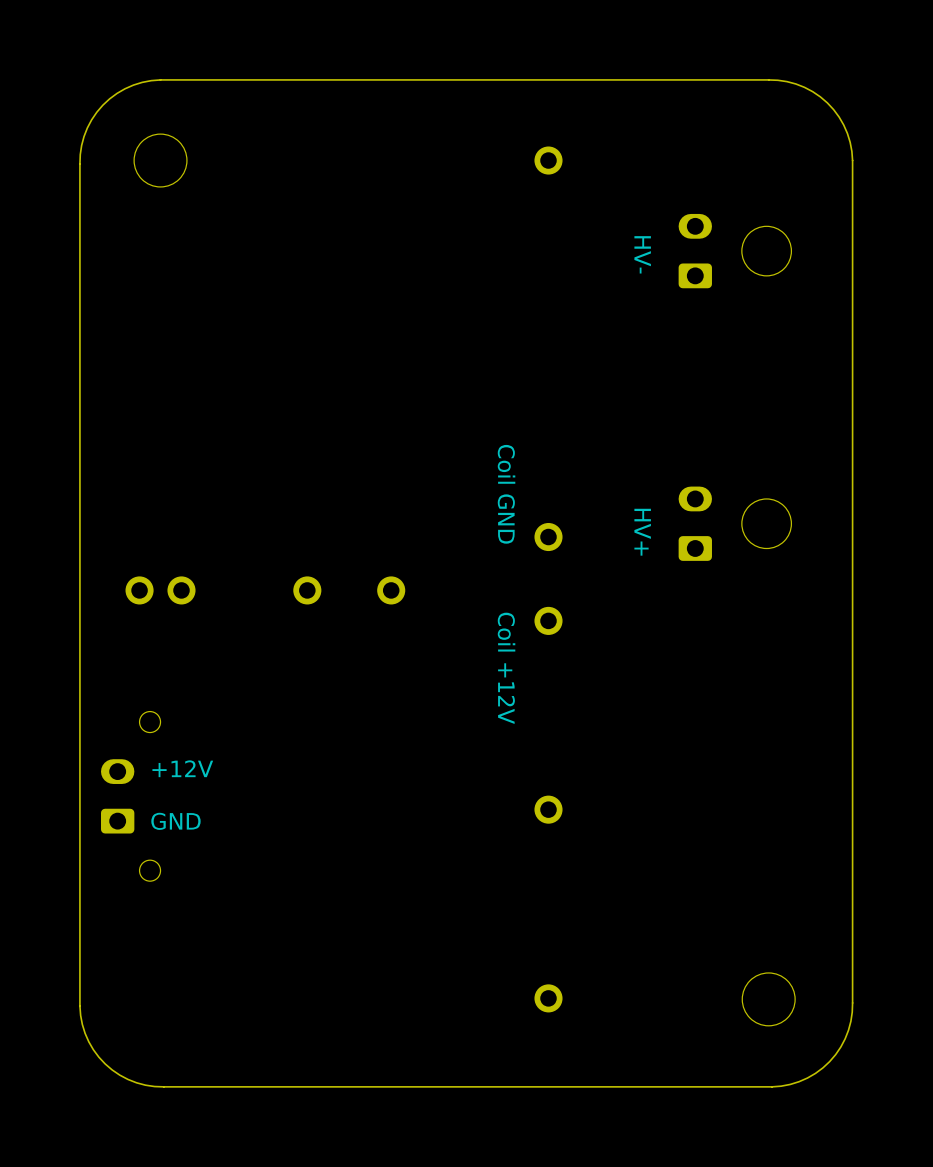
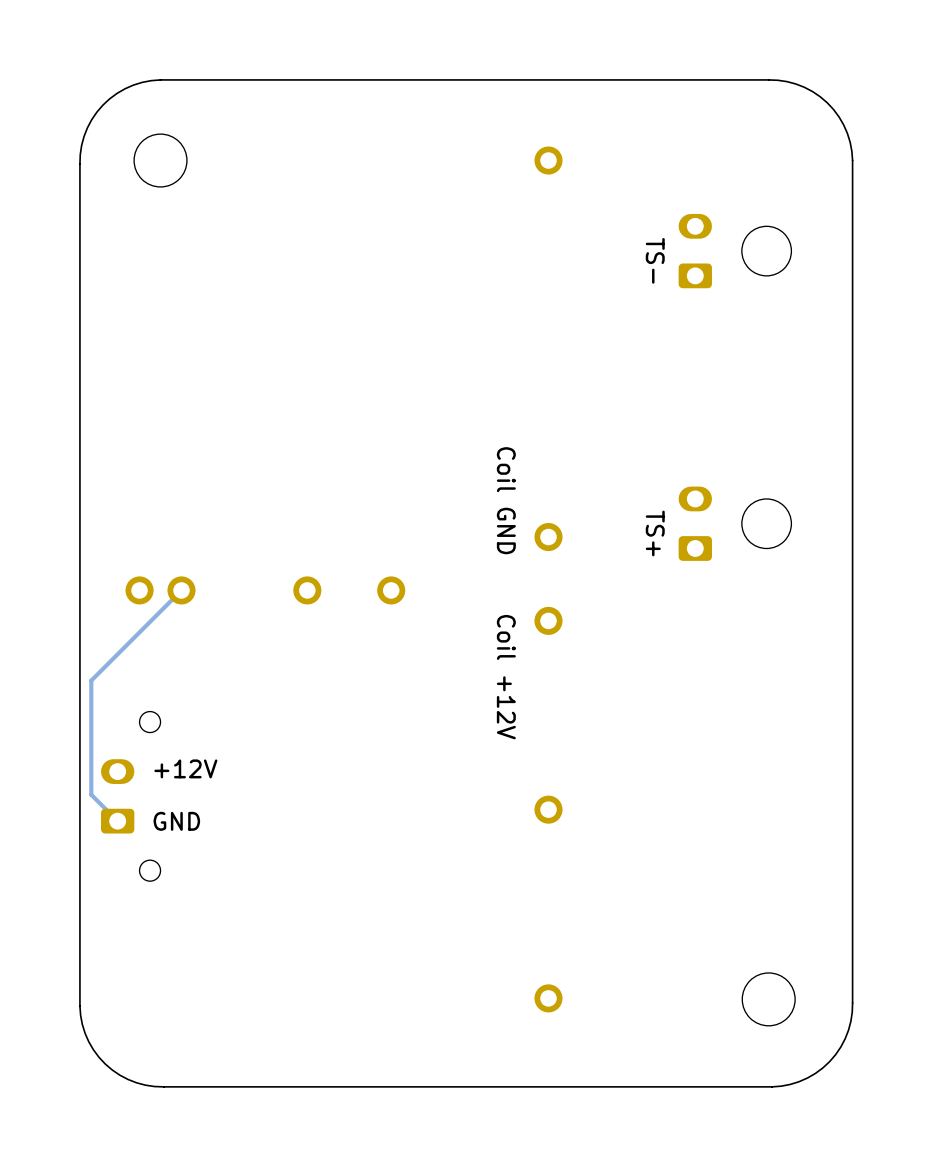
text: HV- (642, 254) -> TS- (655, 260)
text: HV+ (642, 532) -> TS+ (655, 533)
track: none -> (181, 590) (91, 680) (91, 794) (117, 821)

